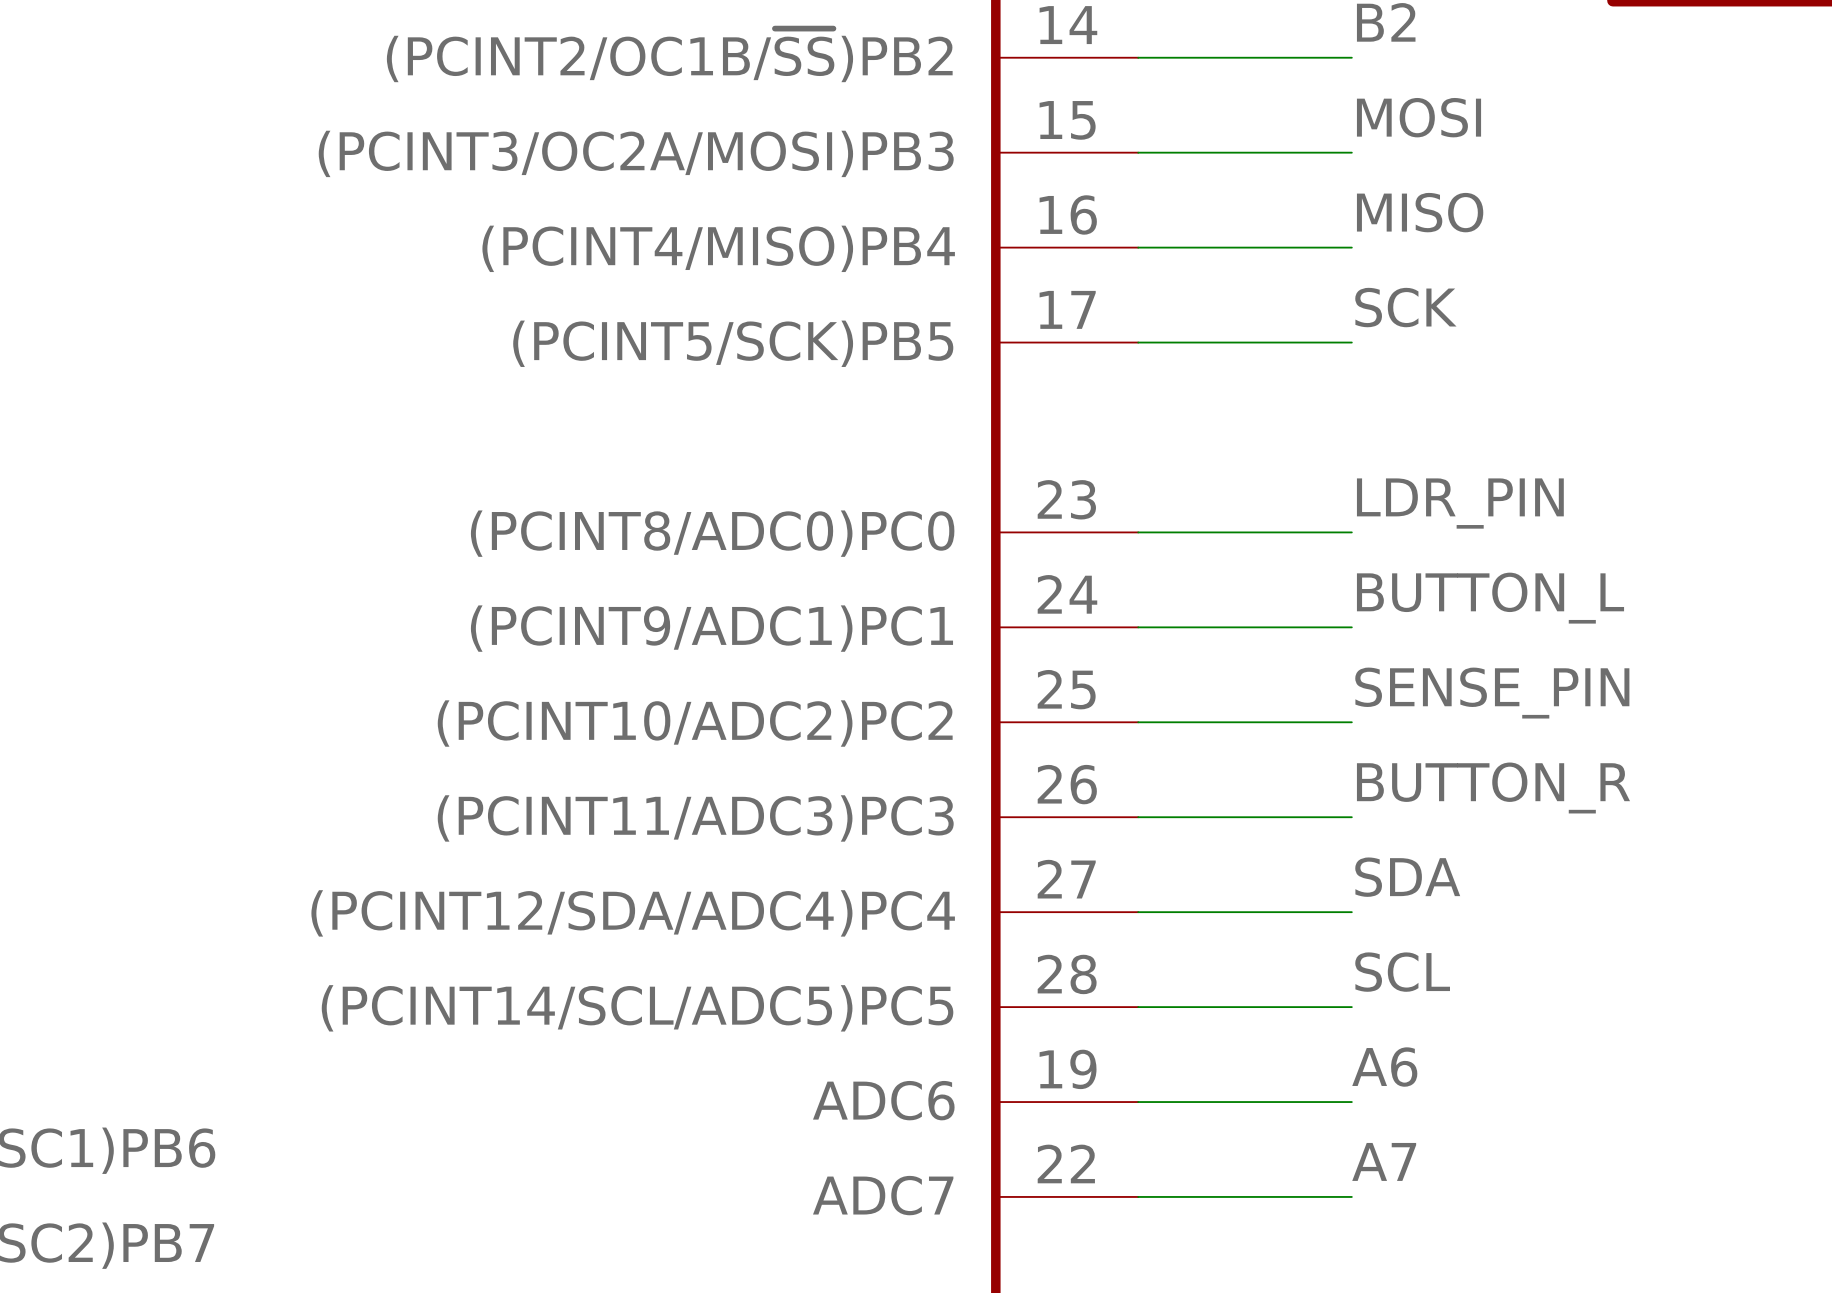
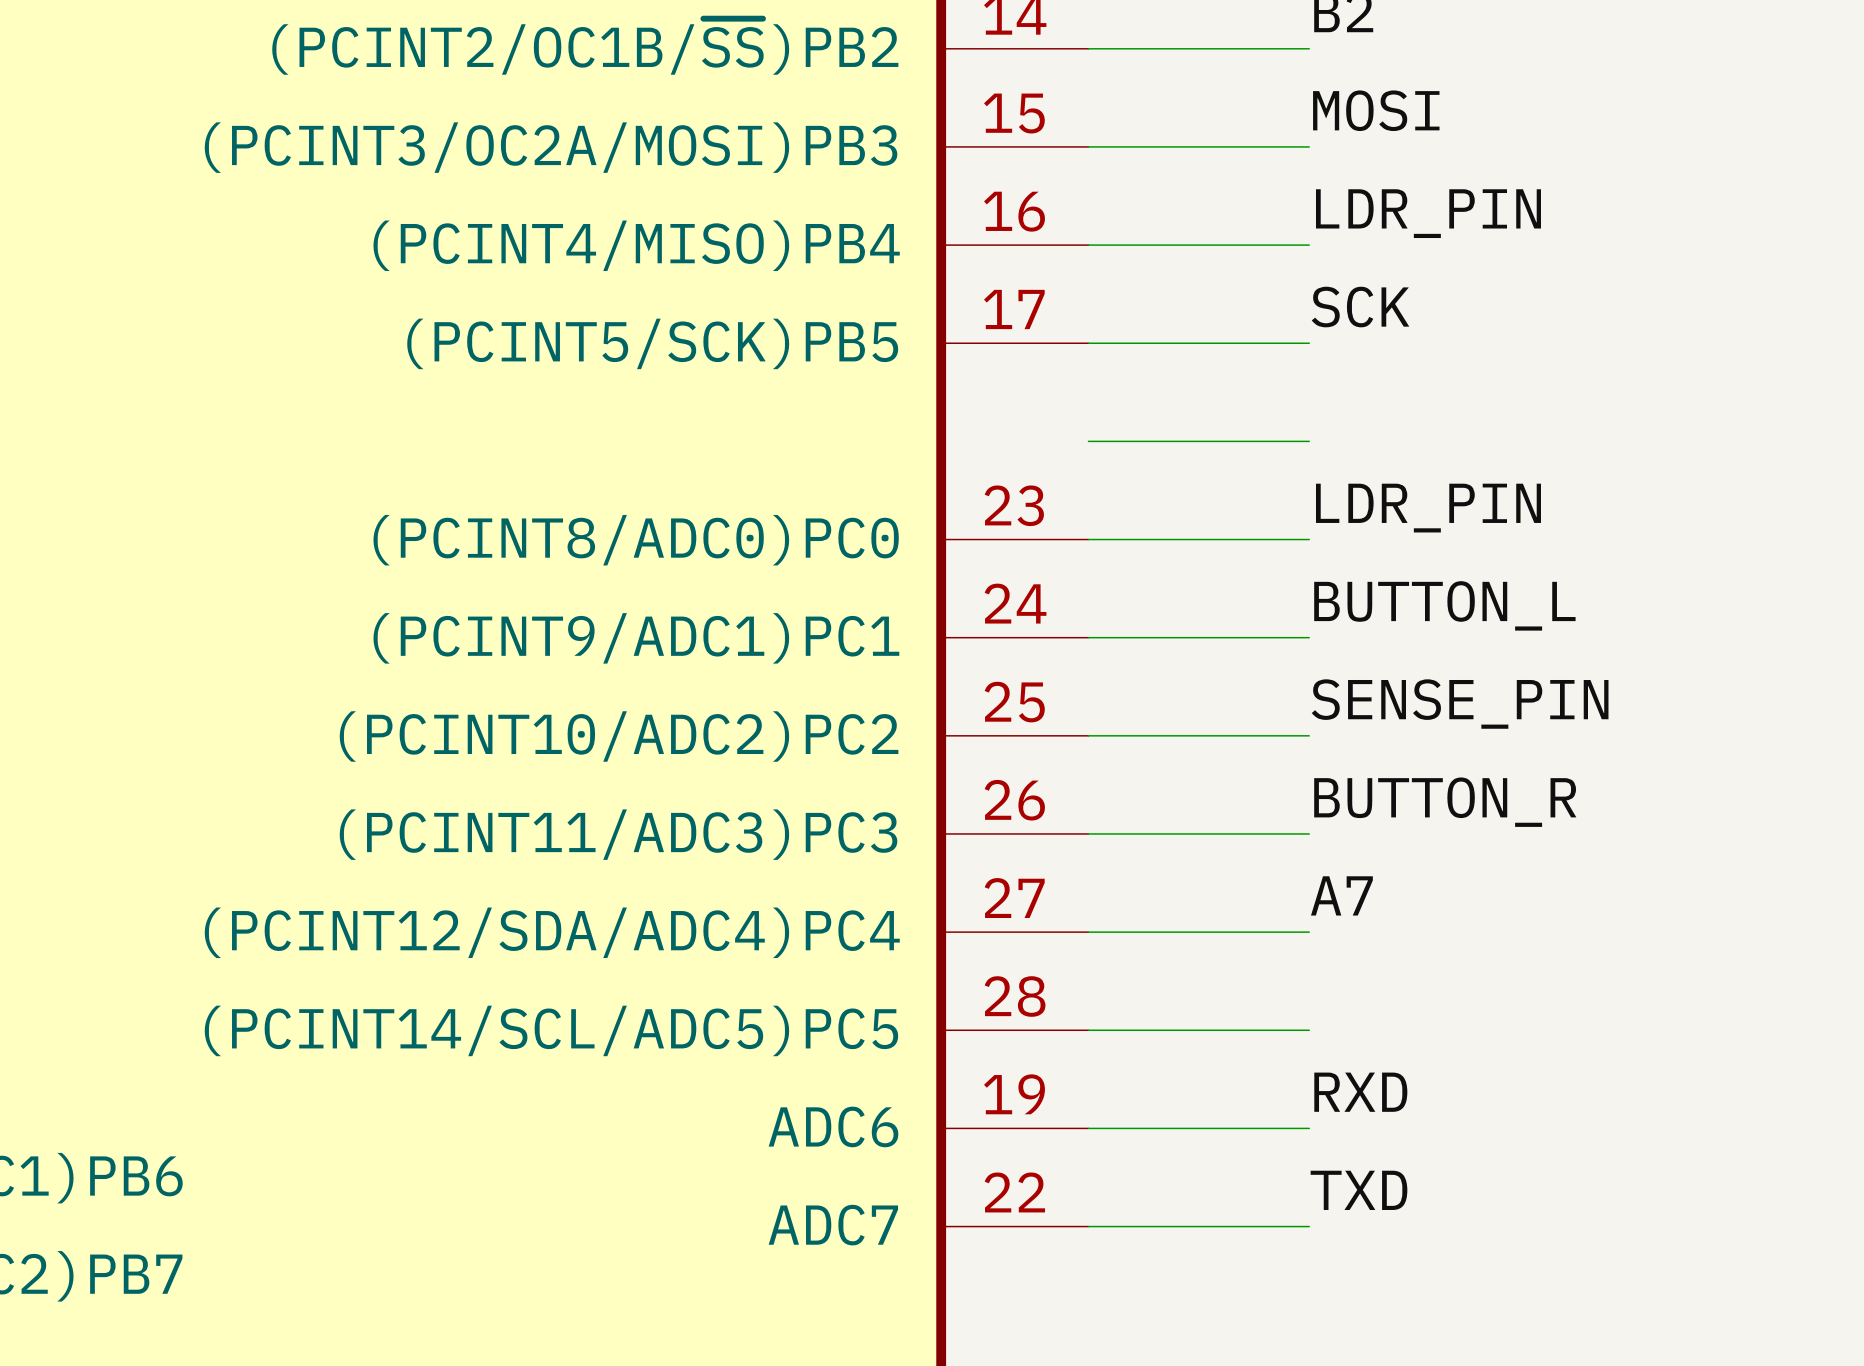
label: MISO (1420, 212) -> LDR_PIN (1428, 213)
wire: none -> (1088, 441) (1309, 441)
label: SDA (1407, 877) -> A7 (1341, 895)
label: SCL (1402, 972) -> none
label: A6 (1384, 1067) -> RXD (1360, 1092)
label: A7 (1384, 1161) -> TXD (1358, 1190)

